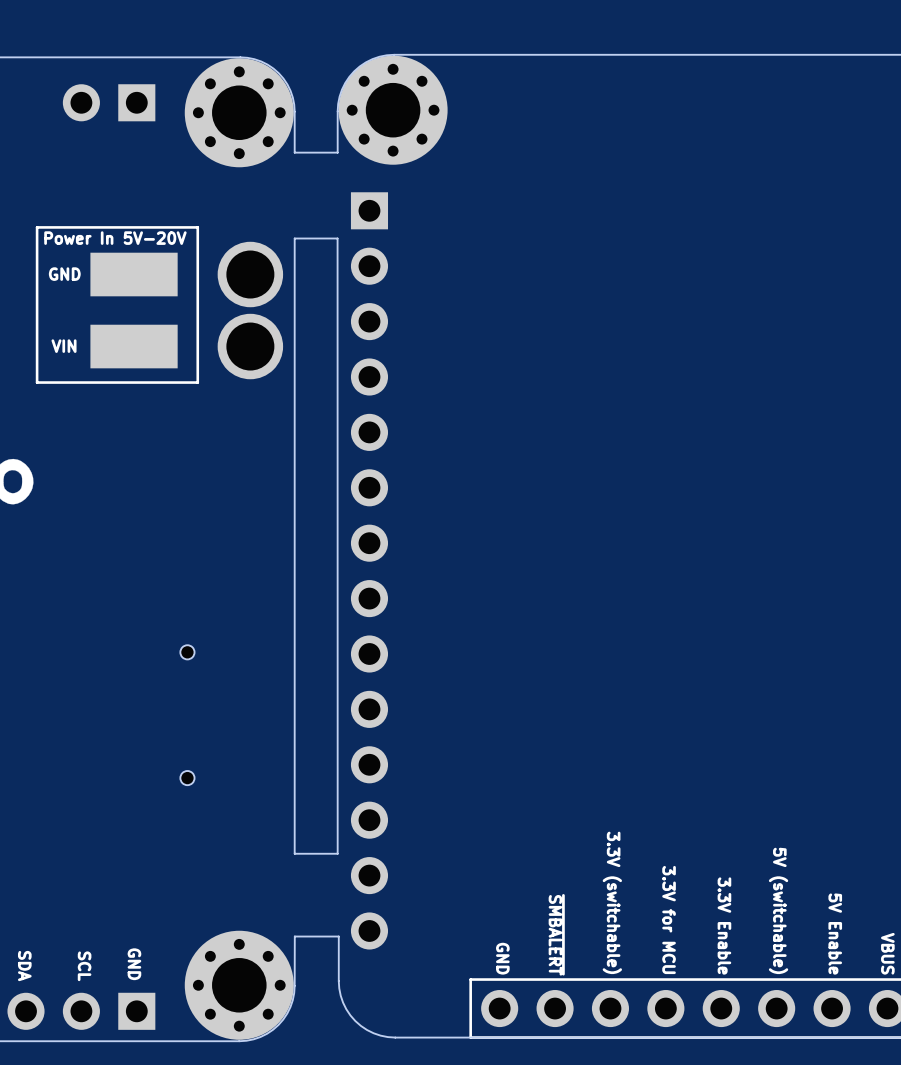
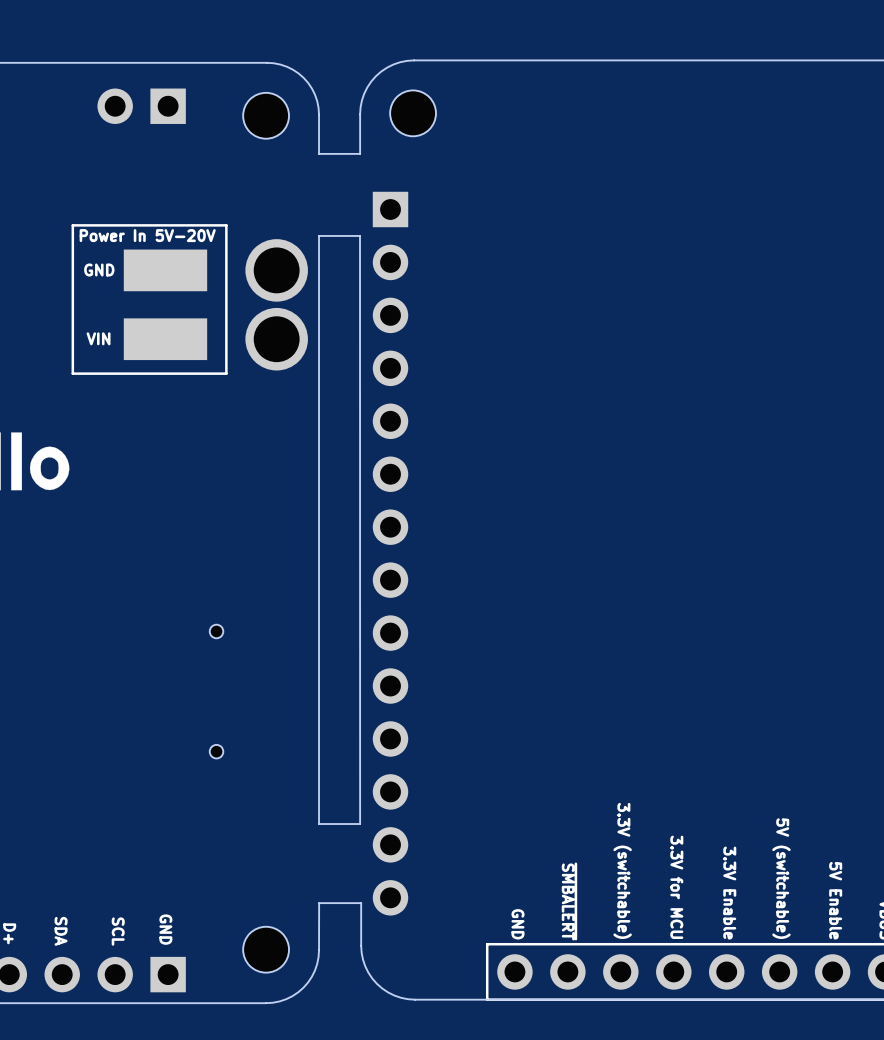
part footprint: [338, 55, 448, 165] -> [390, 90, 436, 137]
part footprint: [184, 58, 294, 168] -> [243, 92, 290, 139]
part footprint: [184, 930, 294, 1040] -> [243, 926, 290, 973]

